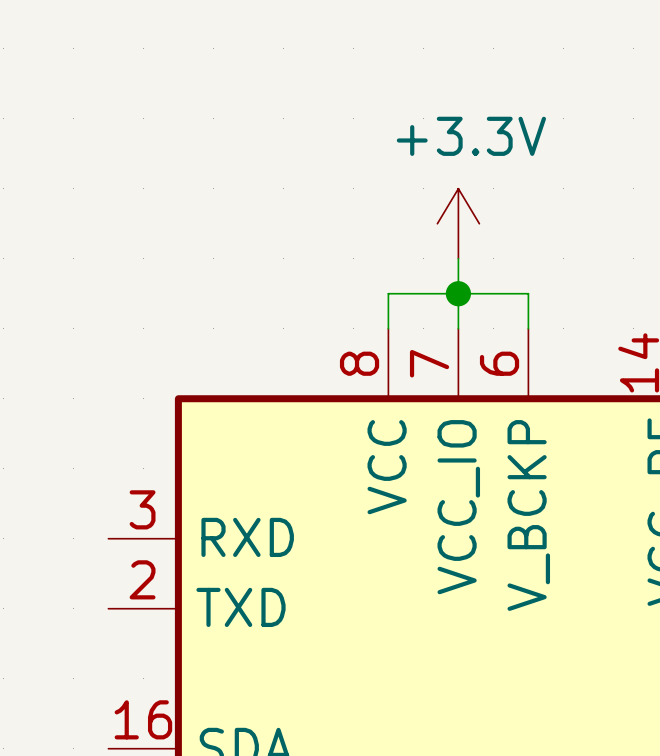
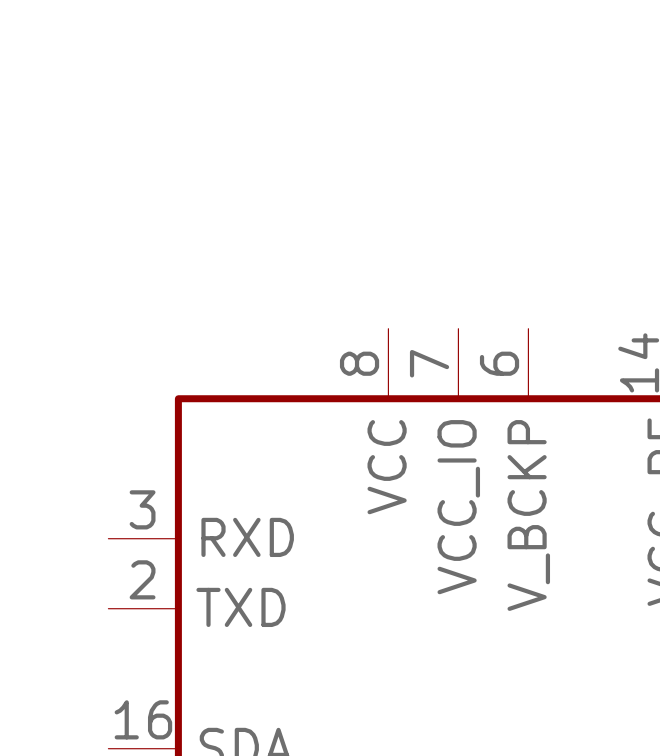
power symbol: +3.3V (458, 223) -> none
wire: (458, 258) (458, 328) -> none
junction: (458, 293) -> none
wire: (388, 328) (388, 293) (528, 293) (528, 328) -> none

